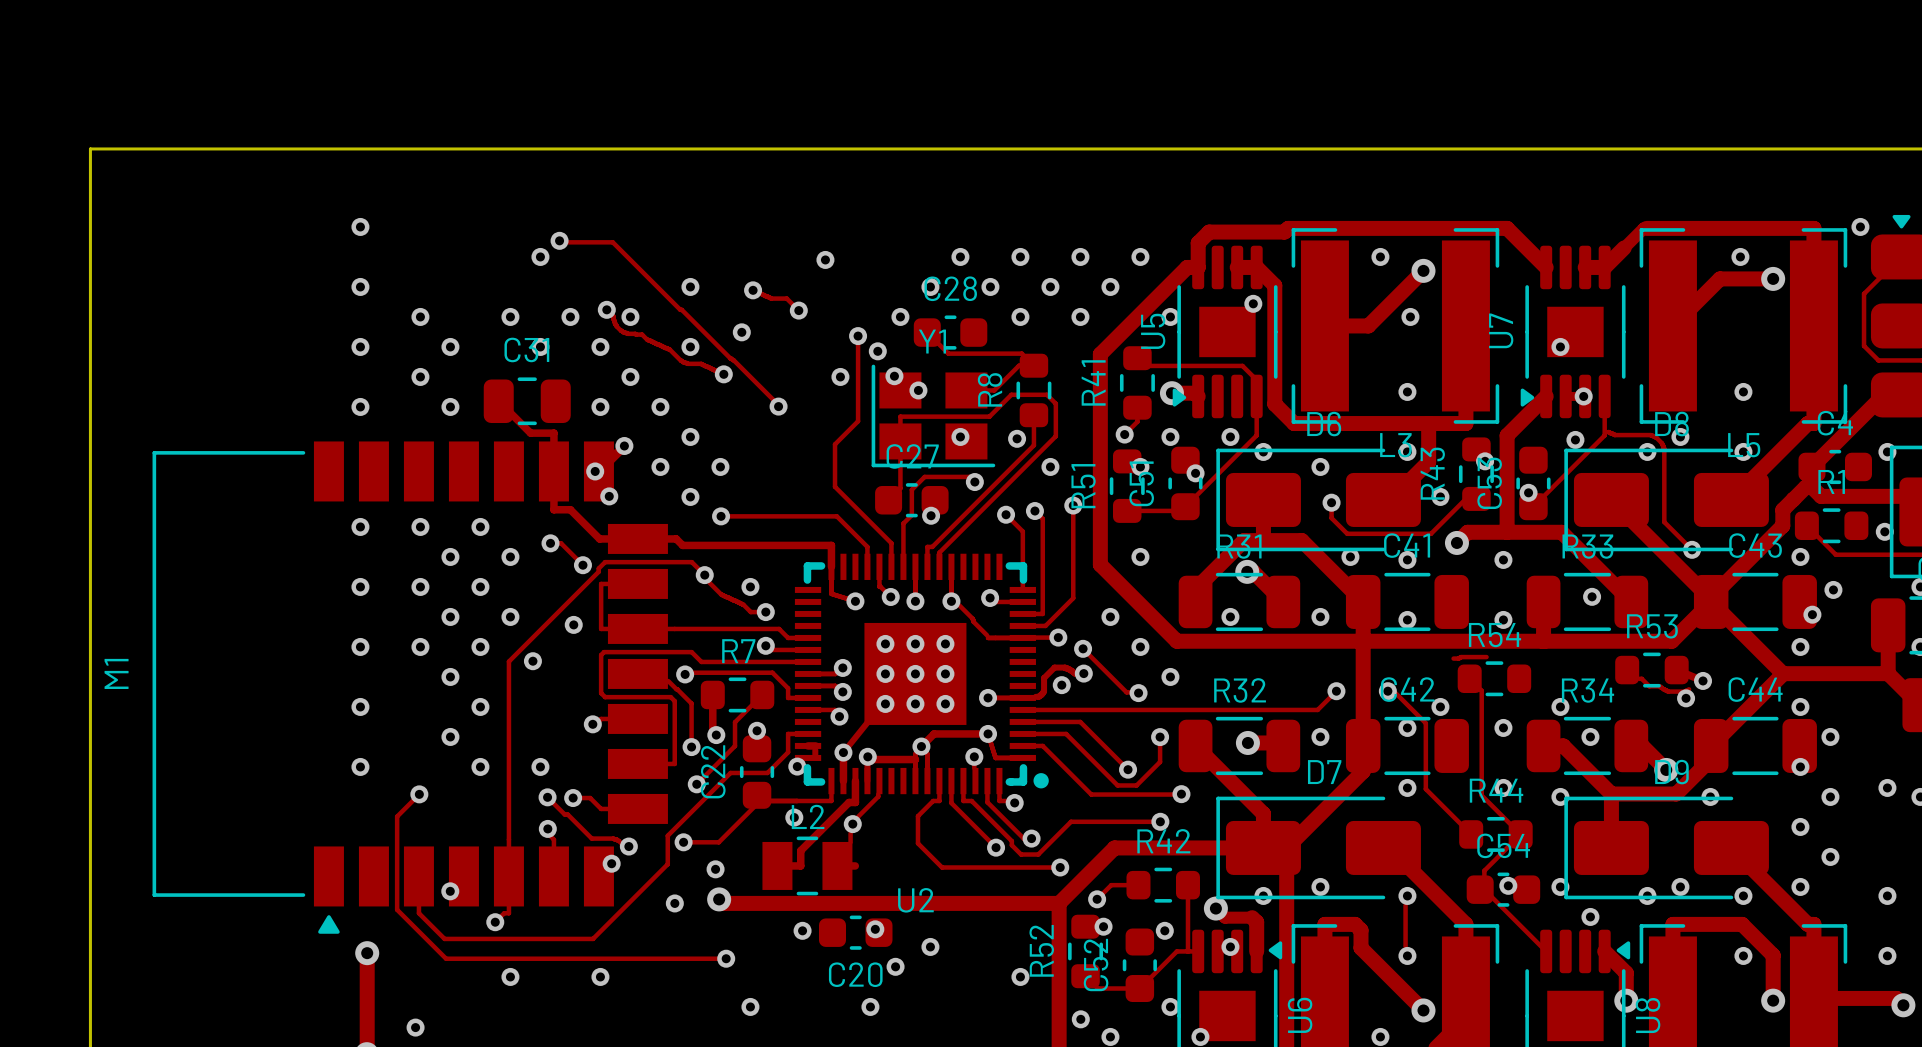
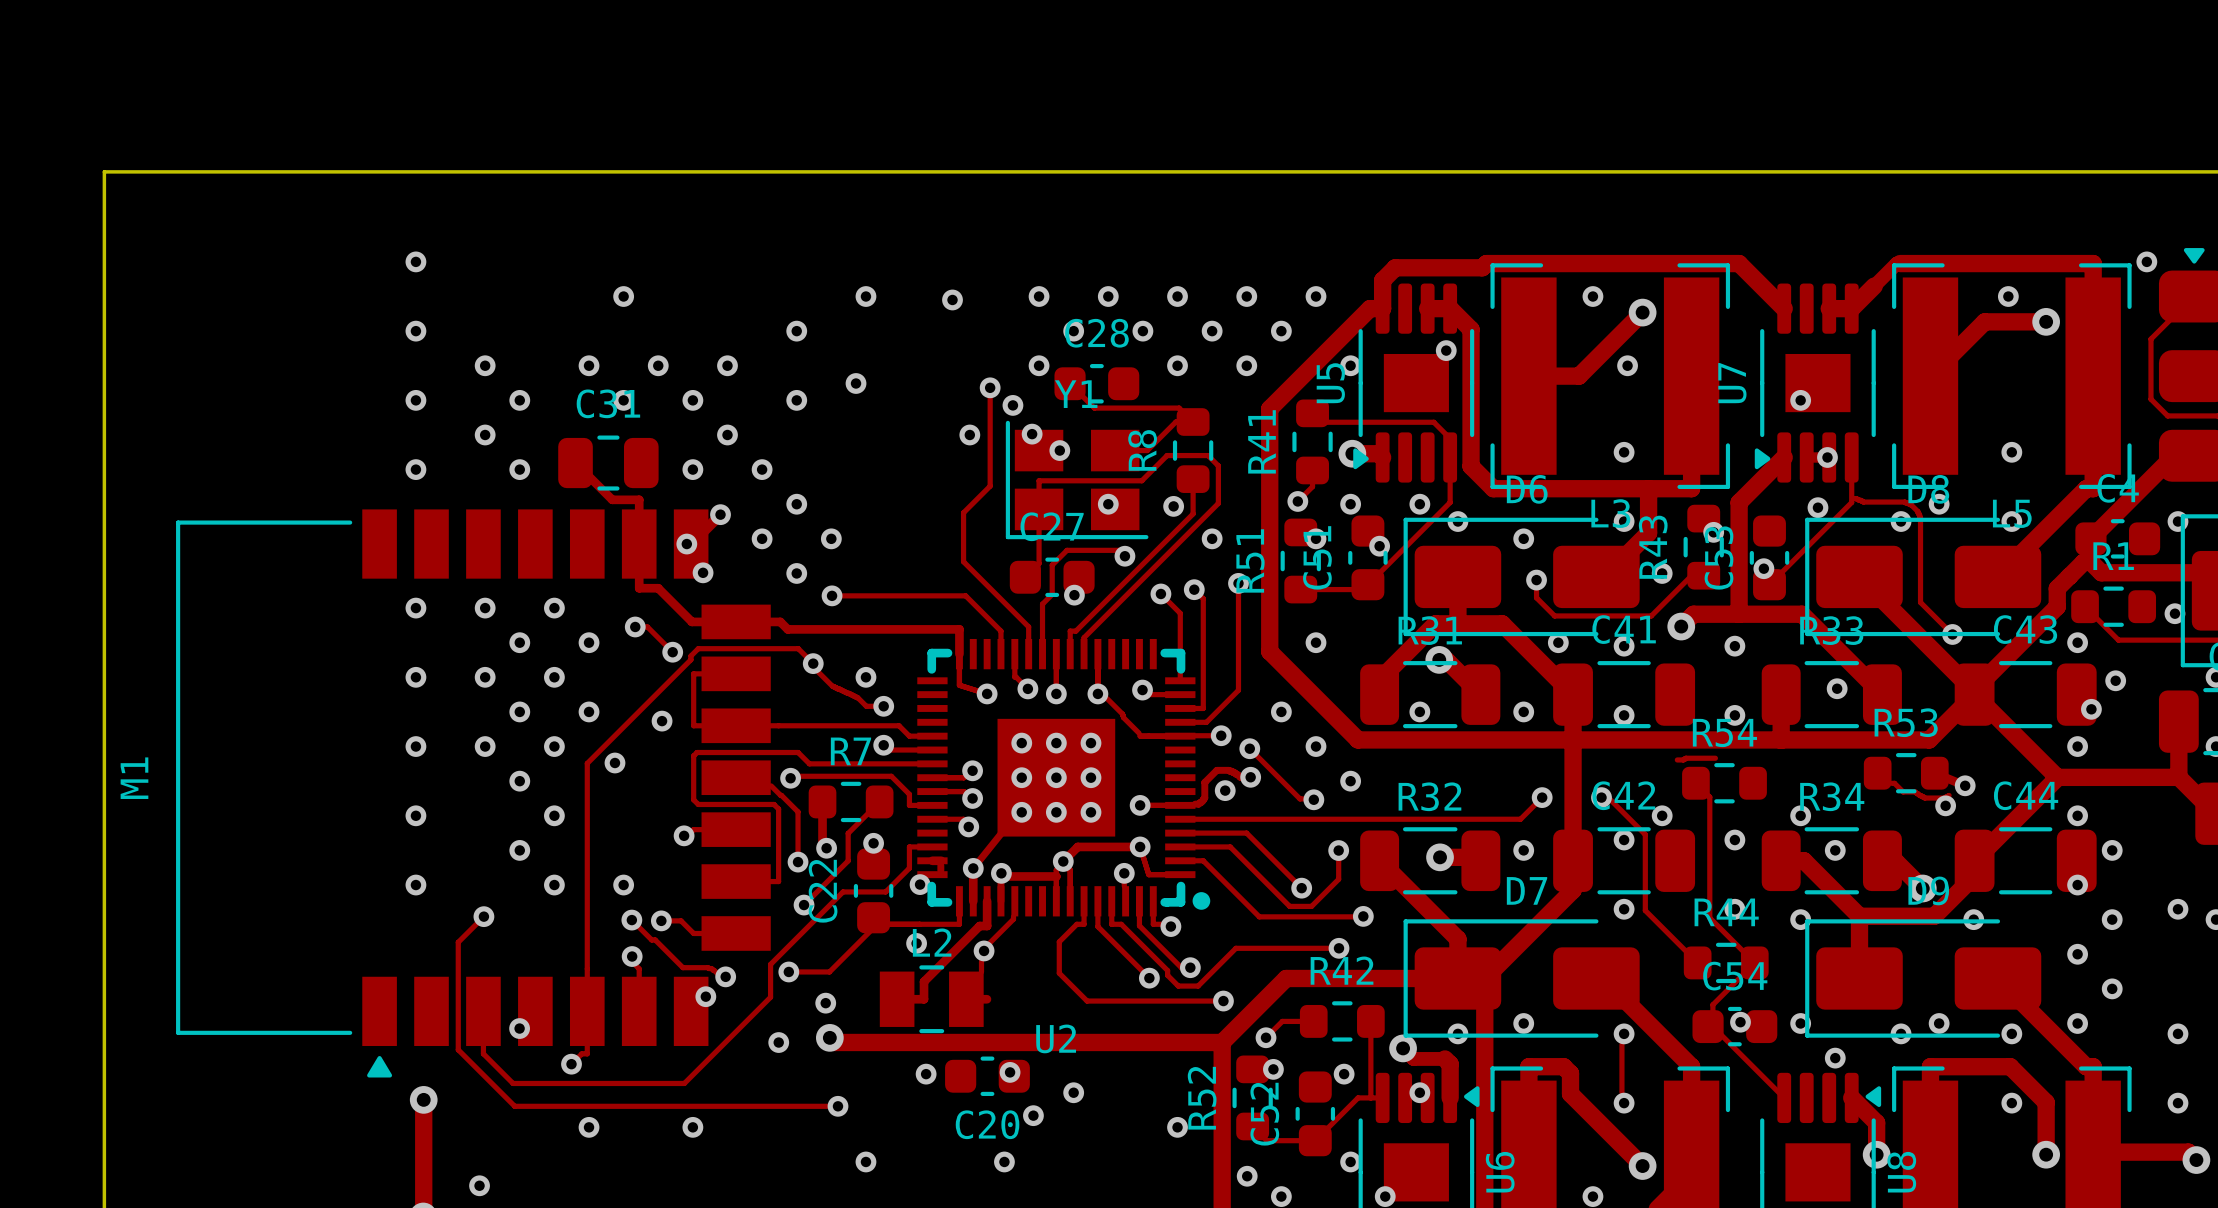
track: (559, 240) (612, 242) (778, 406) -> none
via: (559, 240) -> none
via: none -> (1039, 296)
track: (753, 290) (771, 298) (786, 298) (798, 310) -> none
via position: (753, 290) -> (865, 296)
track: (606, 309) (613, 316) (616, 326) (623, 332) (642, 334) (647, 339) (669, 349) (683, 362) (701, 363) (723, 374) -> none
via: (606, 309) -> none
via: (798, 310) -> none
via: (723, 374) -> none
via: (778, 406) -> none

